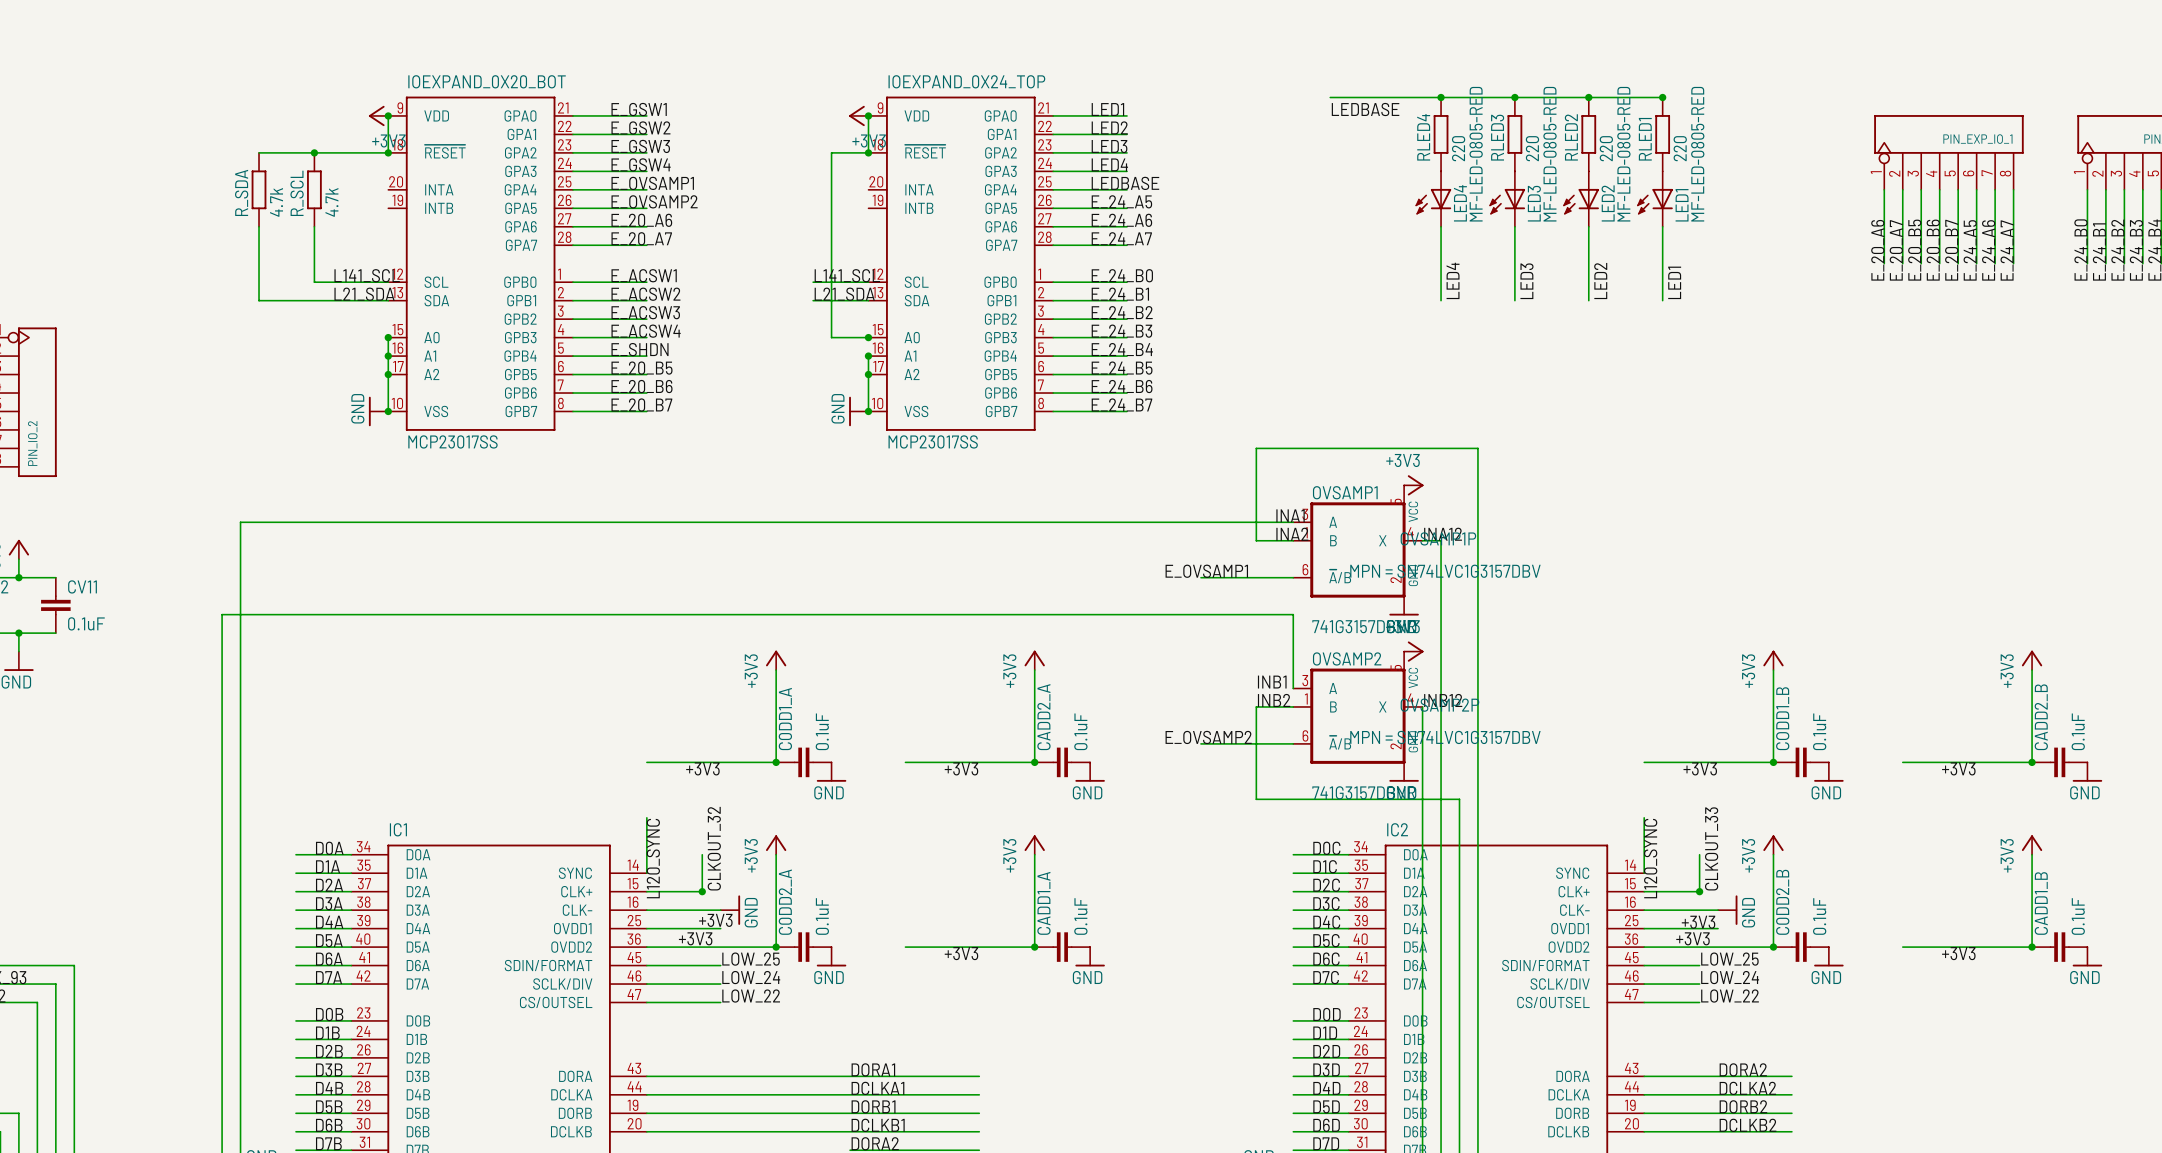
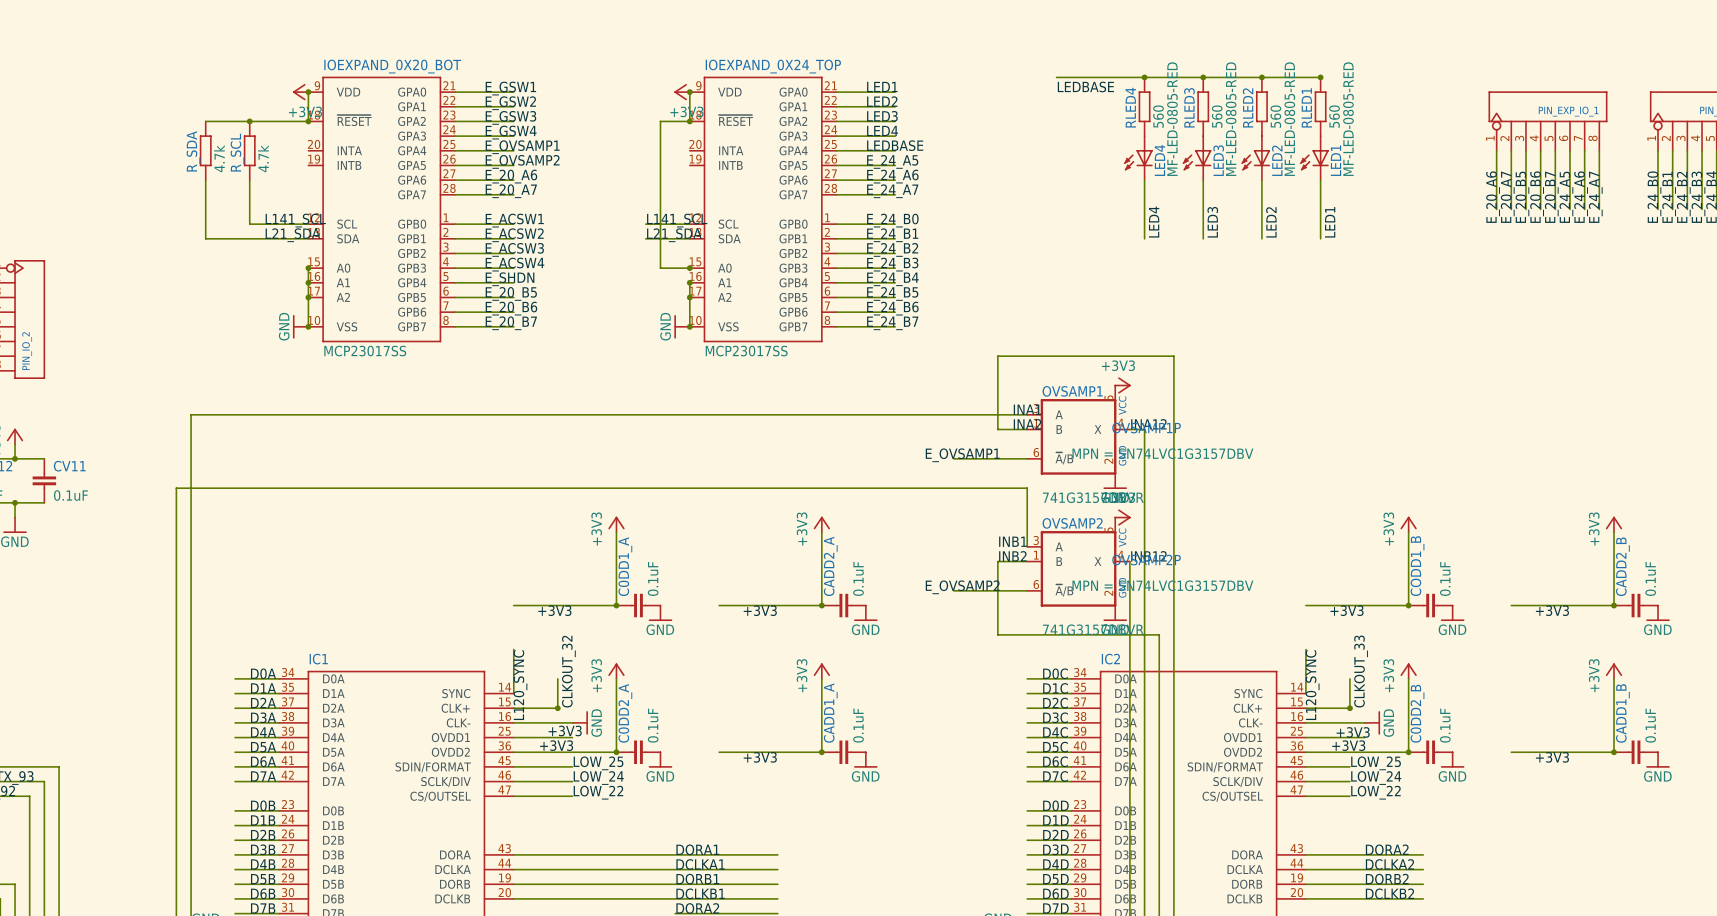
RLED4 value: 220 (1458, 148) -> 560 (1158, 116)
RLED3 value: 220 (1532, 148) -> 560 (1217, 116)
RLED2 value: 220 (1606, 148) -> 560 (1275, 116)
RLED1 value: 220 (1680, 148) -> 560 (1334, 116)

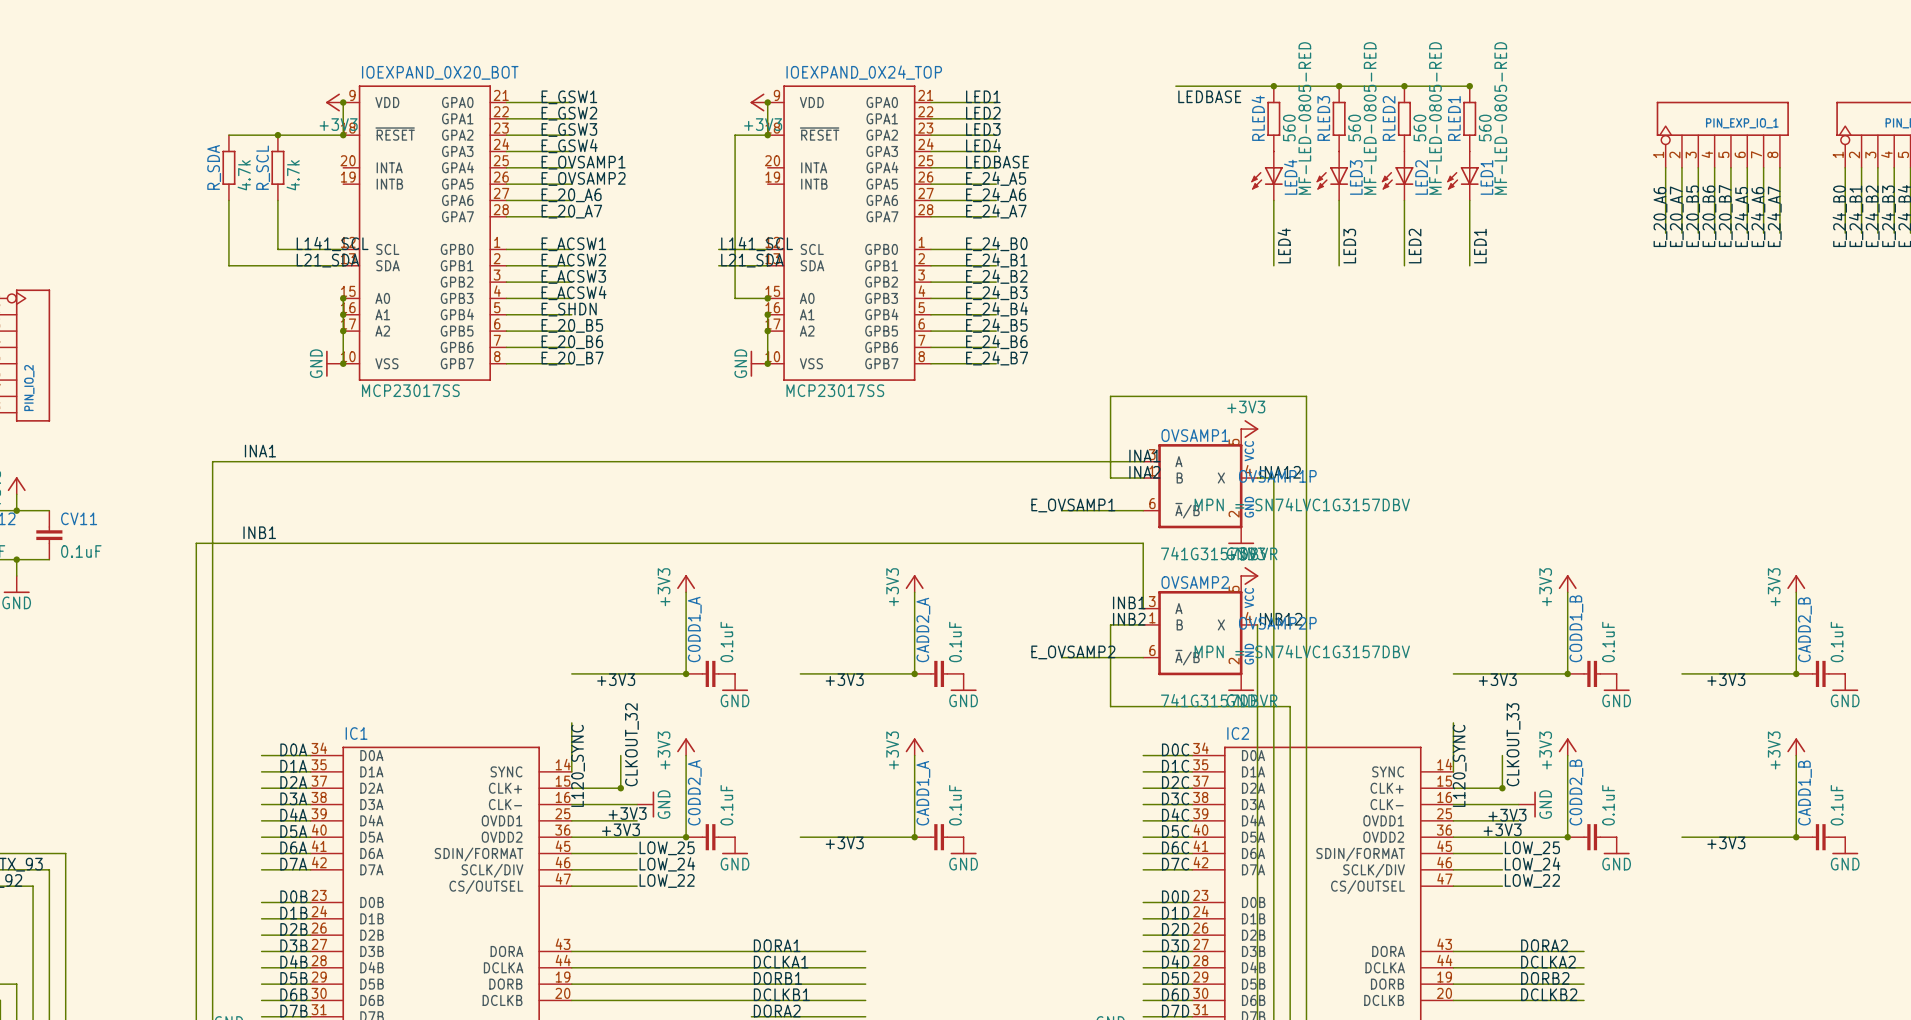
label: none -> INA1 (260, 451)
label: none -> INB1 (259, 532)

